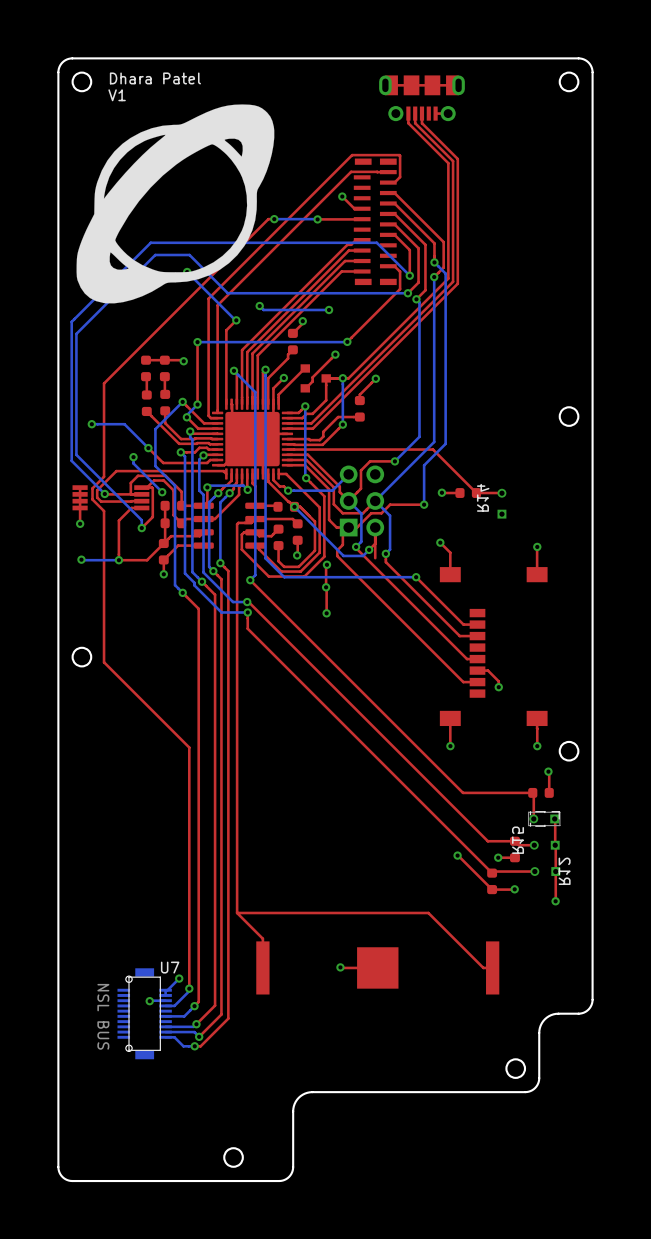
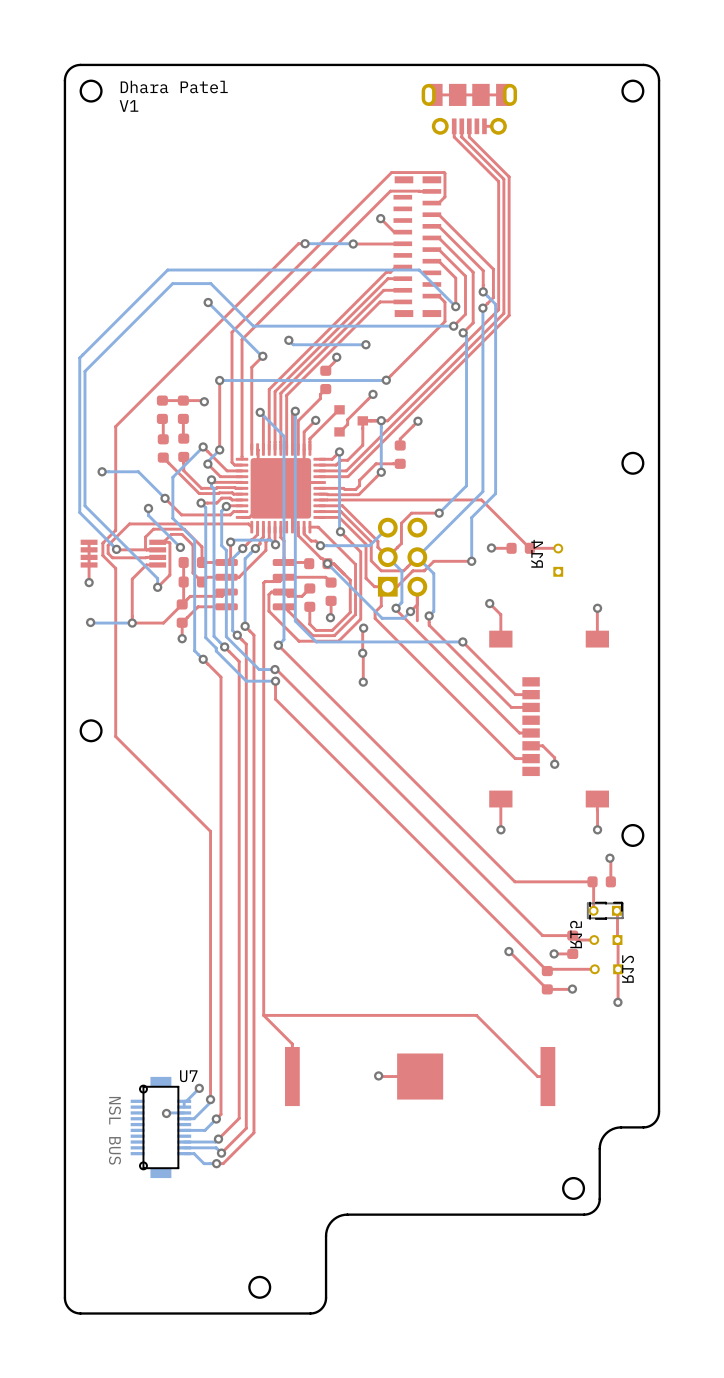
drawing: [76, 104, 275, 304] -> none

